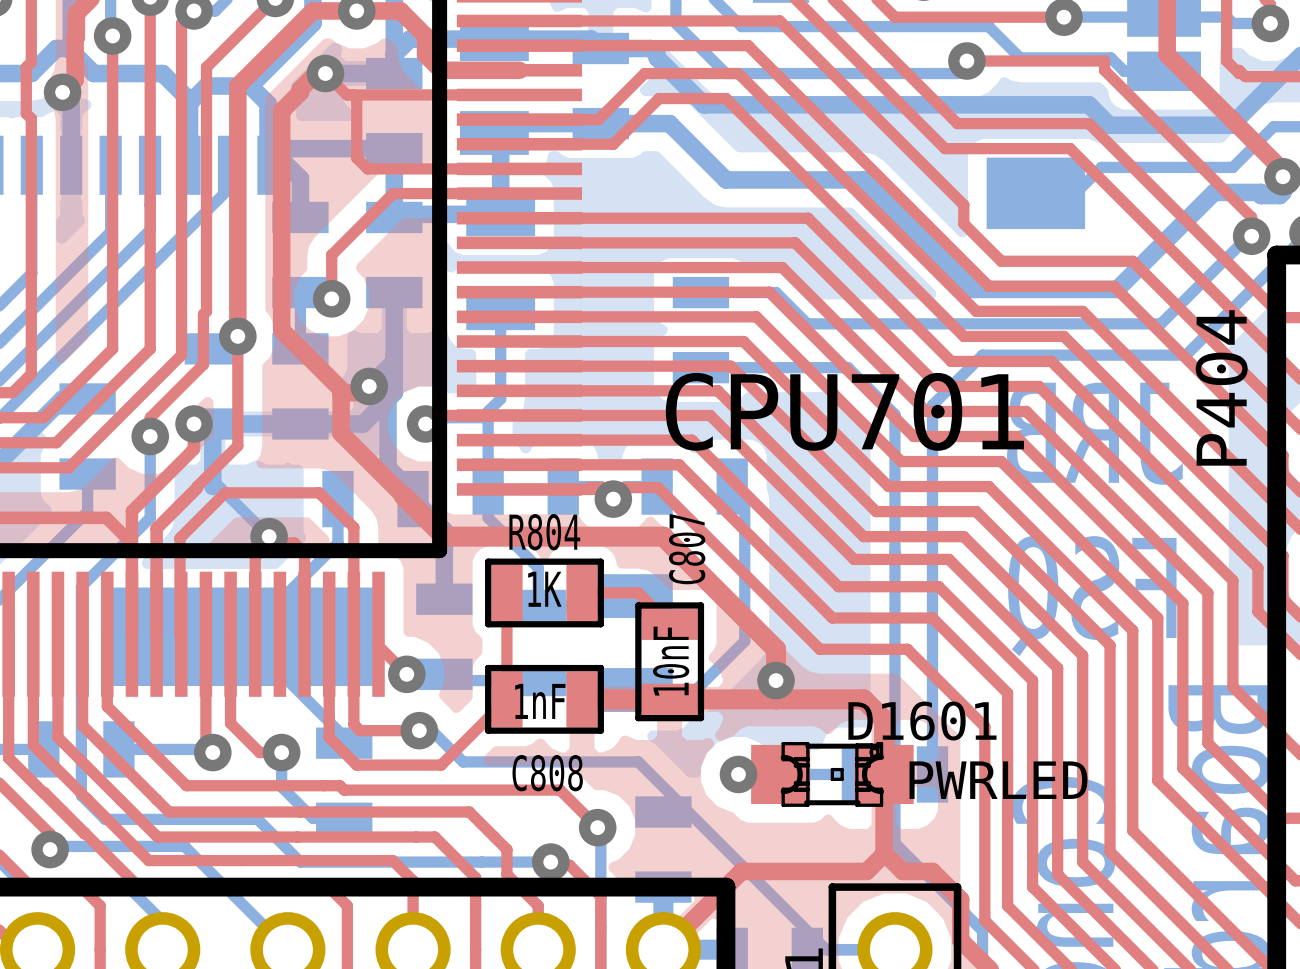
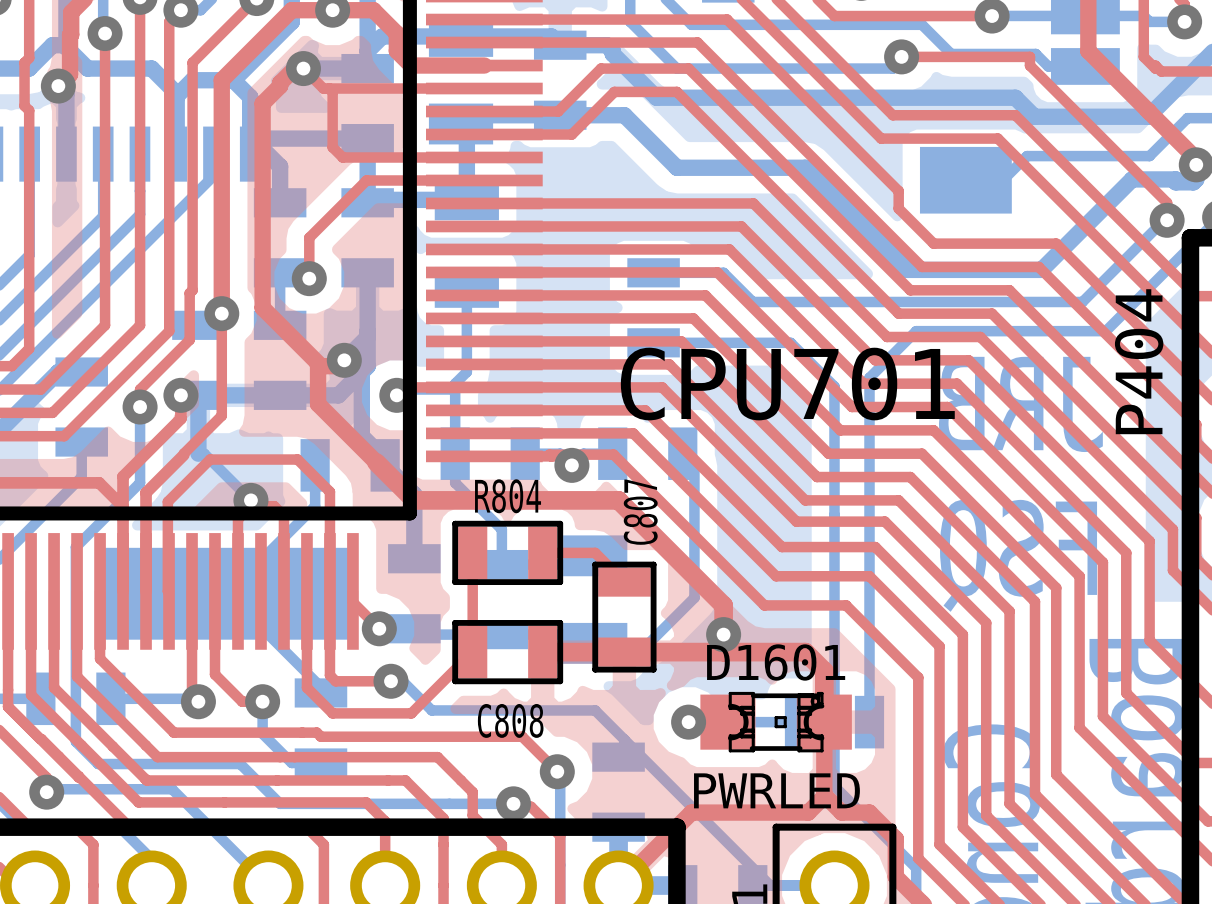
R804 value: 1K (544, 589) -> none
C807 value: 10nF (671, 661) -> none
C808 value: 1nF (540, 701) -> none
D1601 name position: D1601 (922, 721) -> D1601 (776, 662)
D1601 value position: PWRLED (998, 780) -> PWRLED (776, 790)

